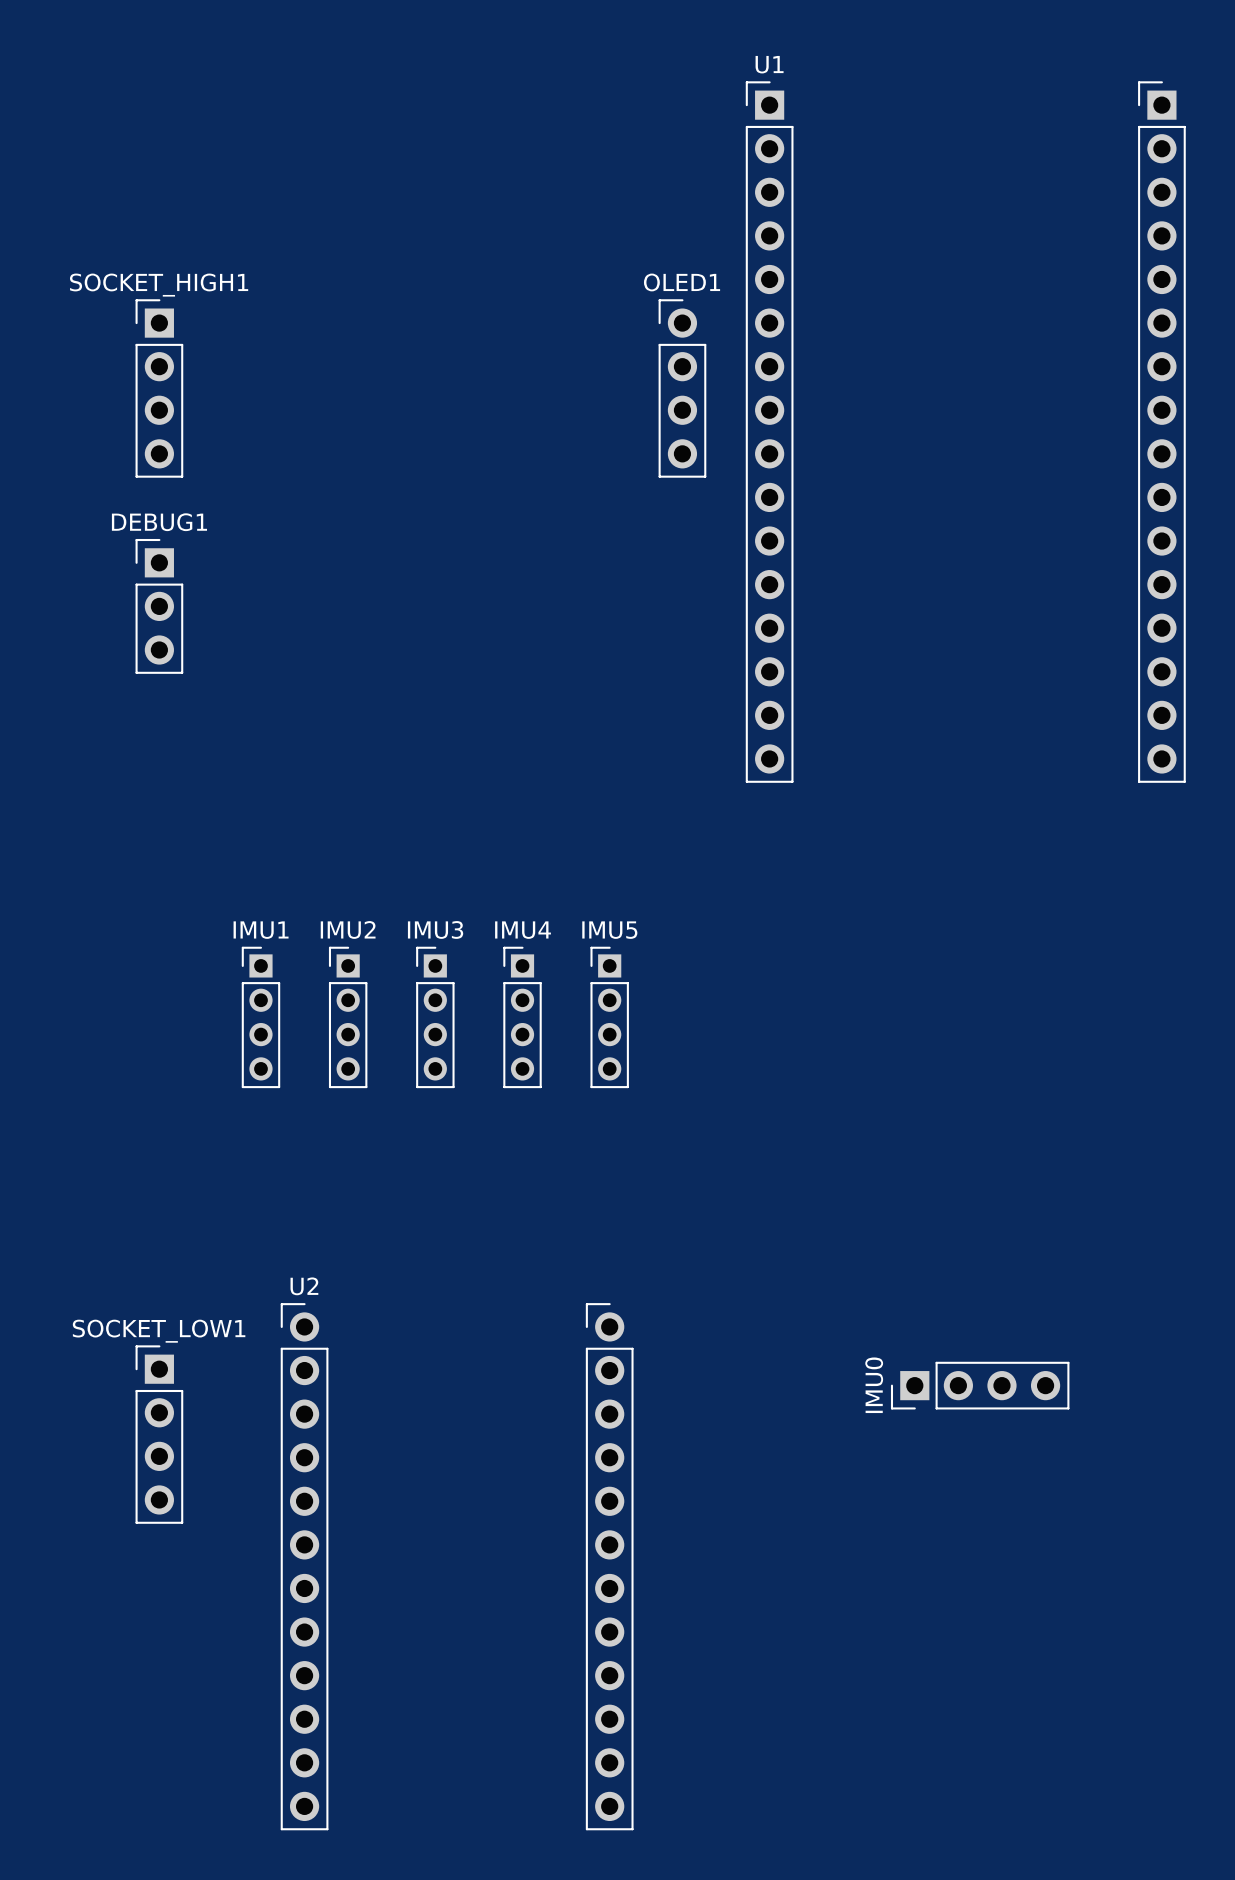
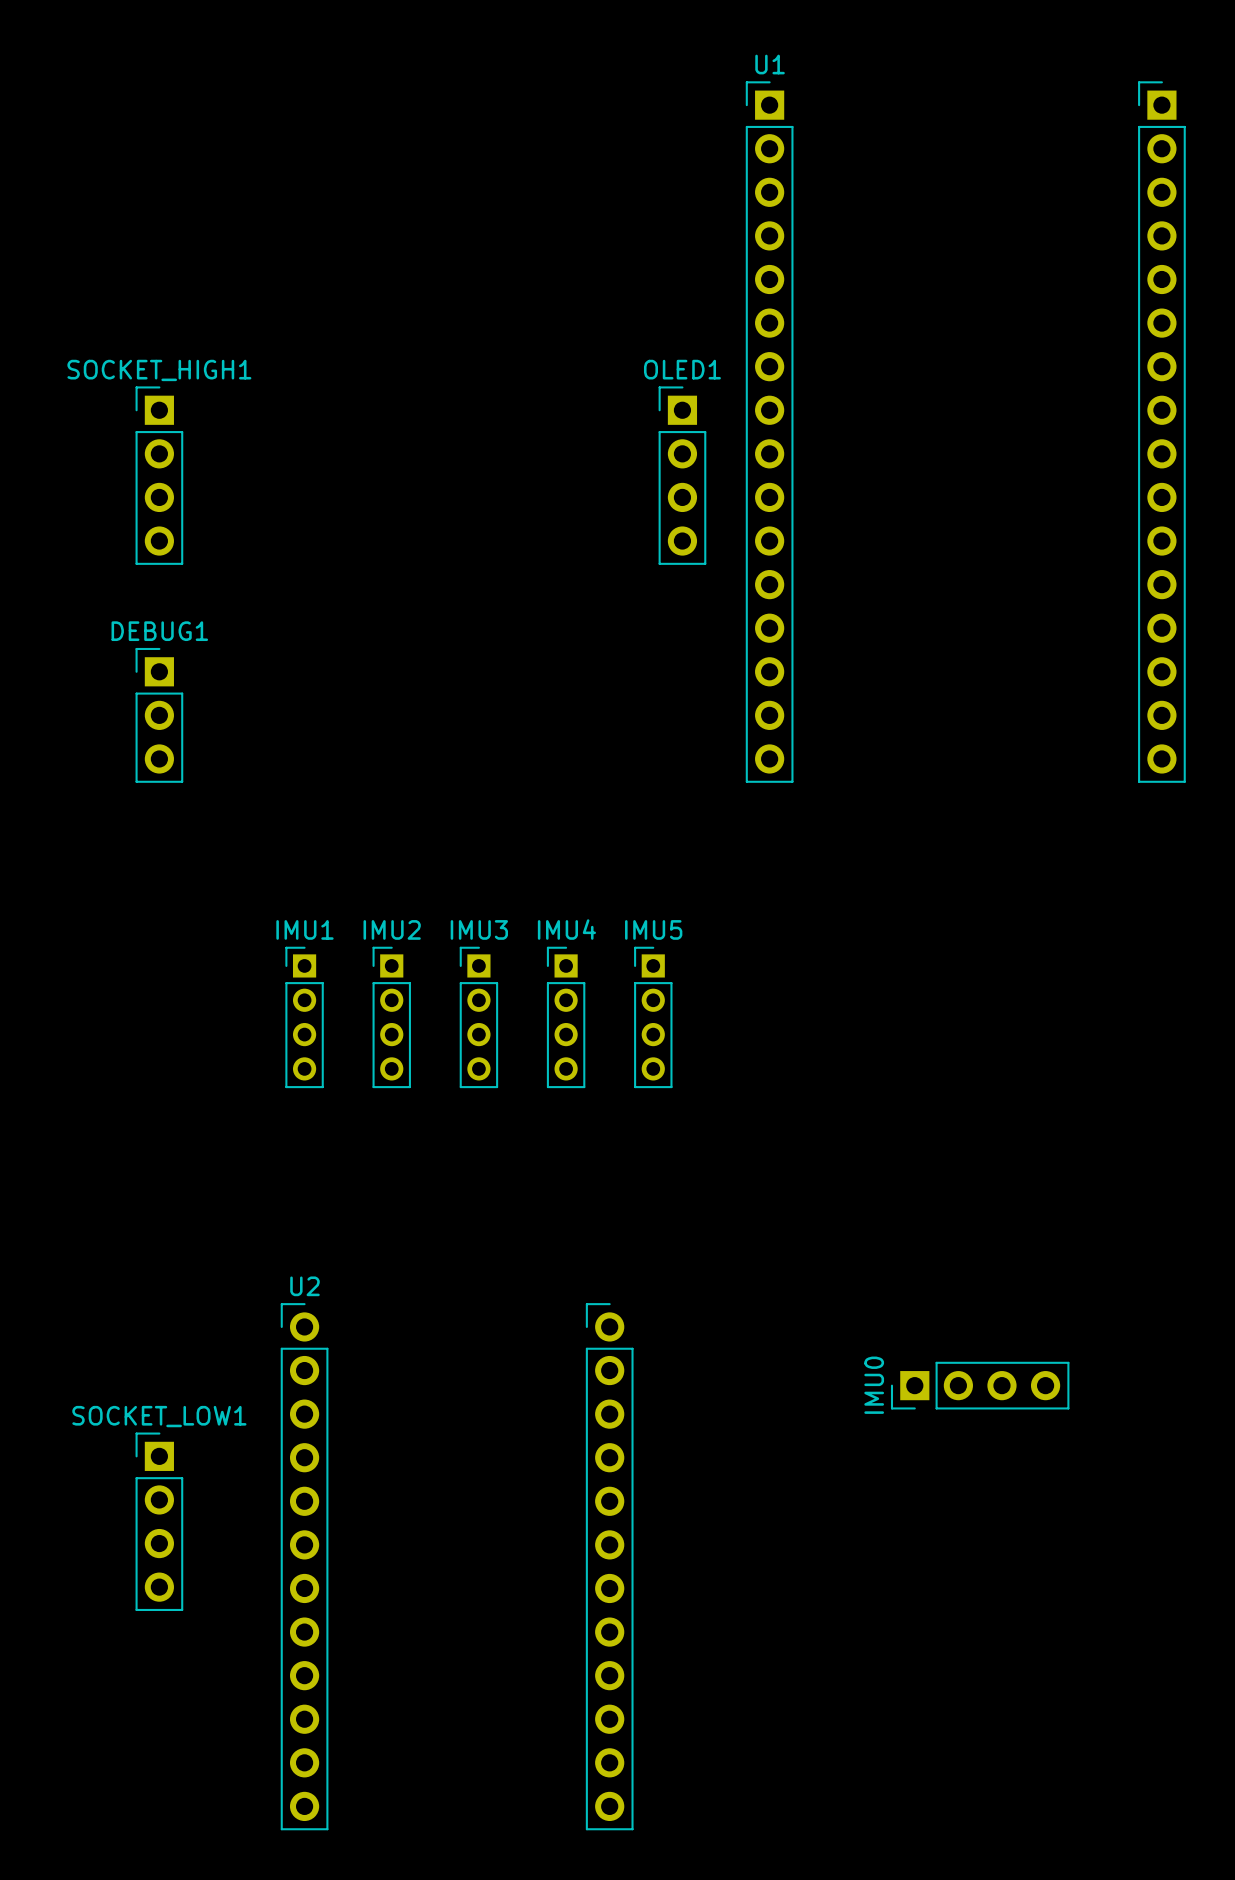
OLED1 footprint: [658, 299, 707, 478] -> [658, 386, 707, 565]
SOCKET_HIGH1 position: (159, 388) -> (159, 475)
DEBUG1 position: (159, 606) -> (159, 715)
IMU1 position: (260, 1017) -> (304, 1017)
IMU2 position: (348, 1017) -> (391, 1017)
IMU3 position: (435, 1017) -> (478, 1017)
IMU4 position: (522, 1017) -> (566, 1017)
IMU5 position: (609, 1017) -> (653, 1017)
SOCKET_LOW1 position: (159, 1434) -> (159, 1521)

